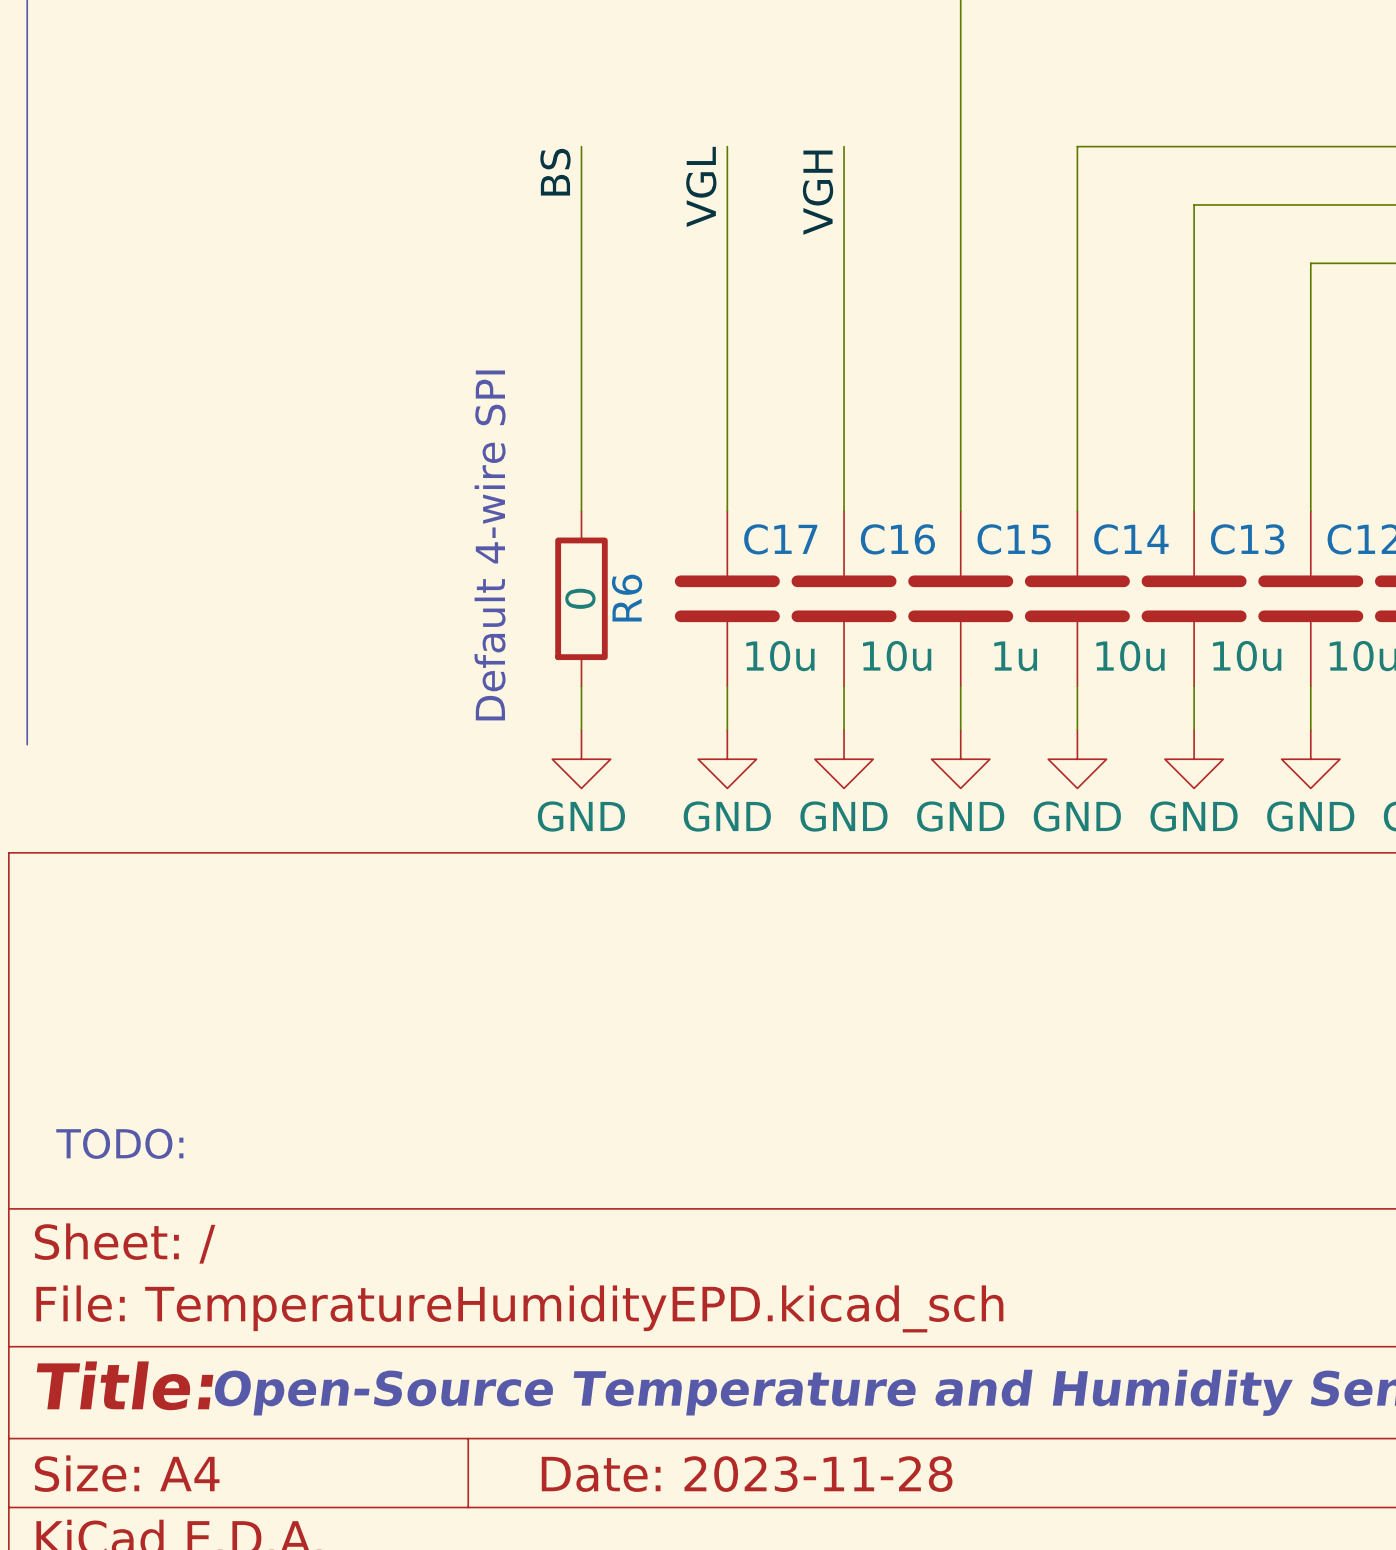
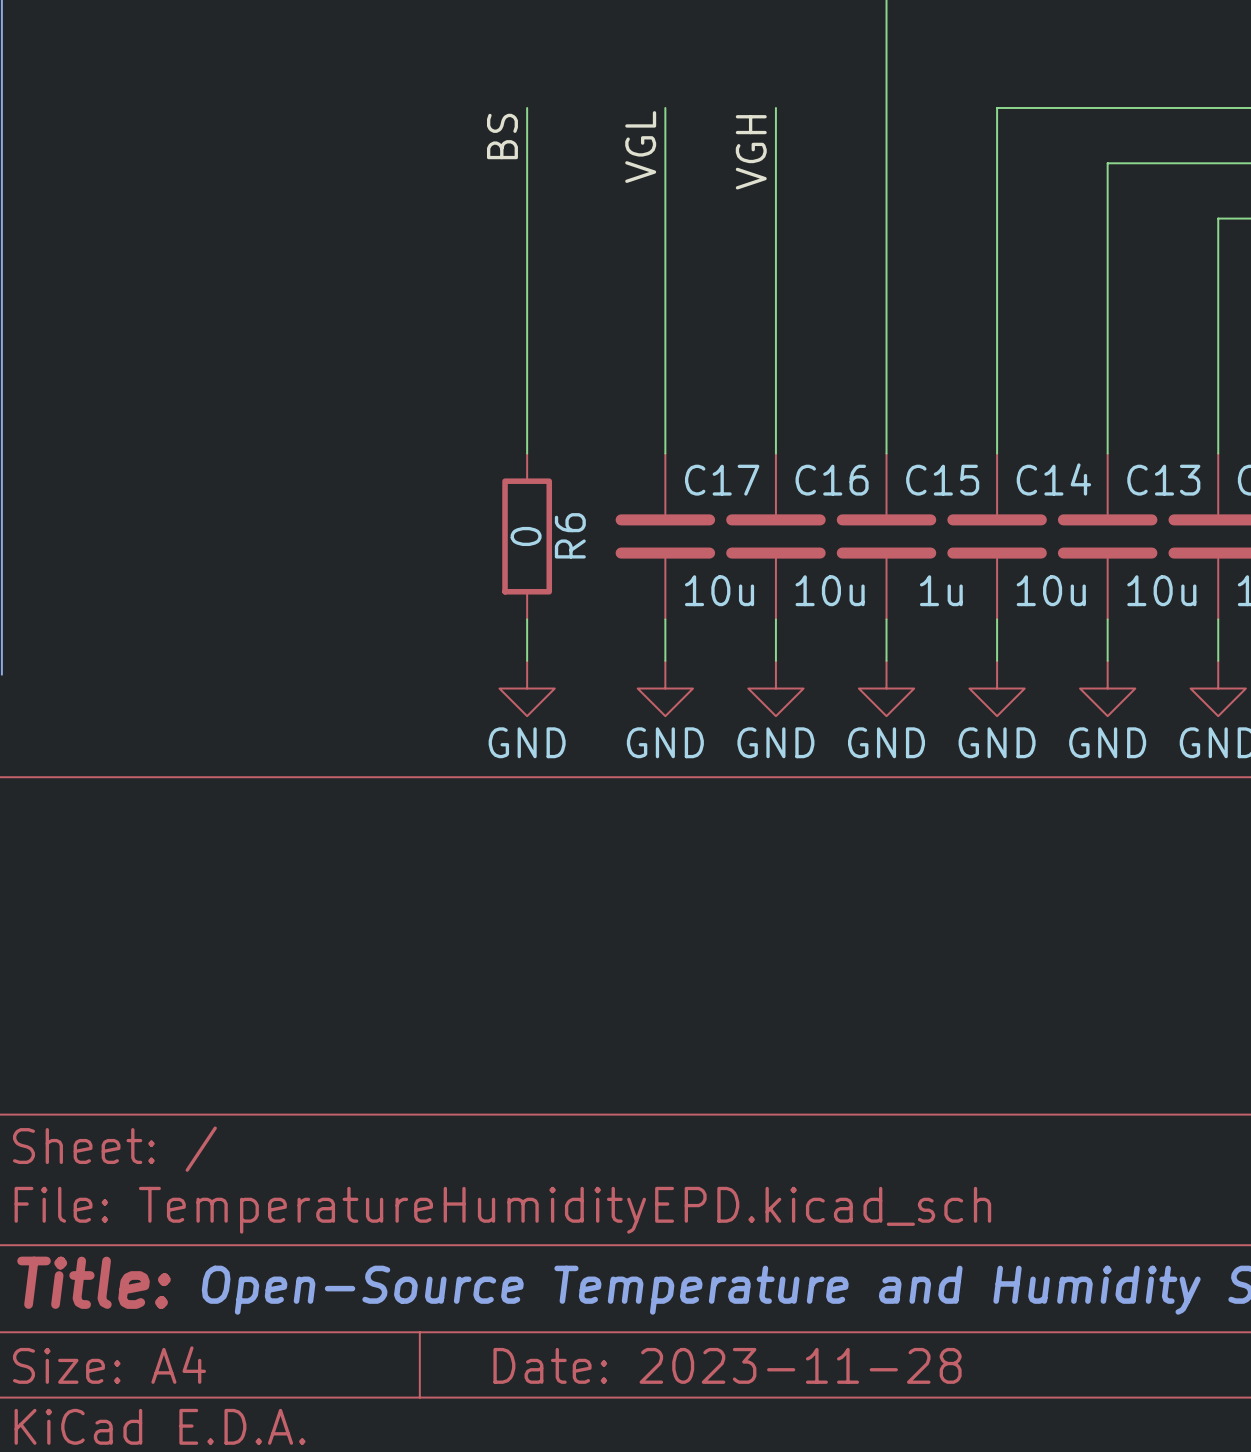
text: Default 4-wire SPI (490, 545) -> none
text: TODO: (119, 1143) -> none

